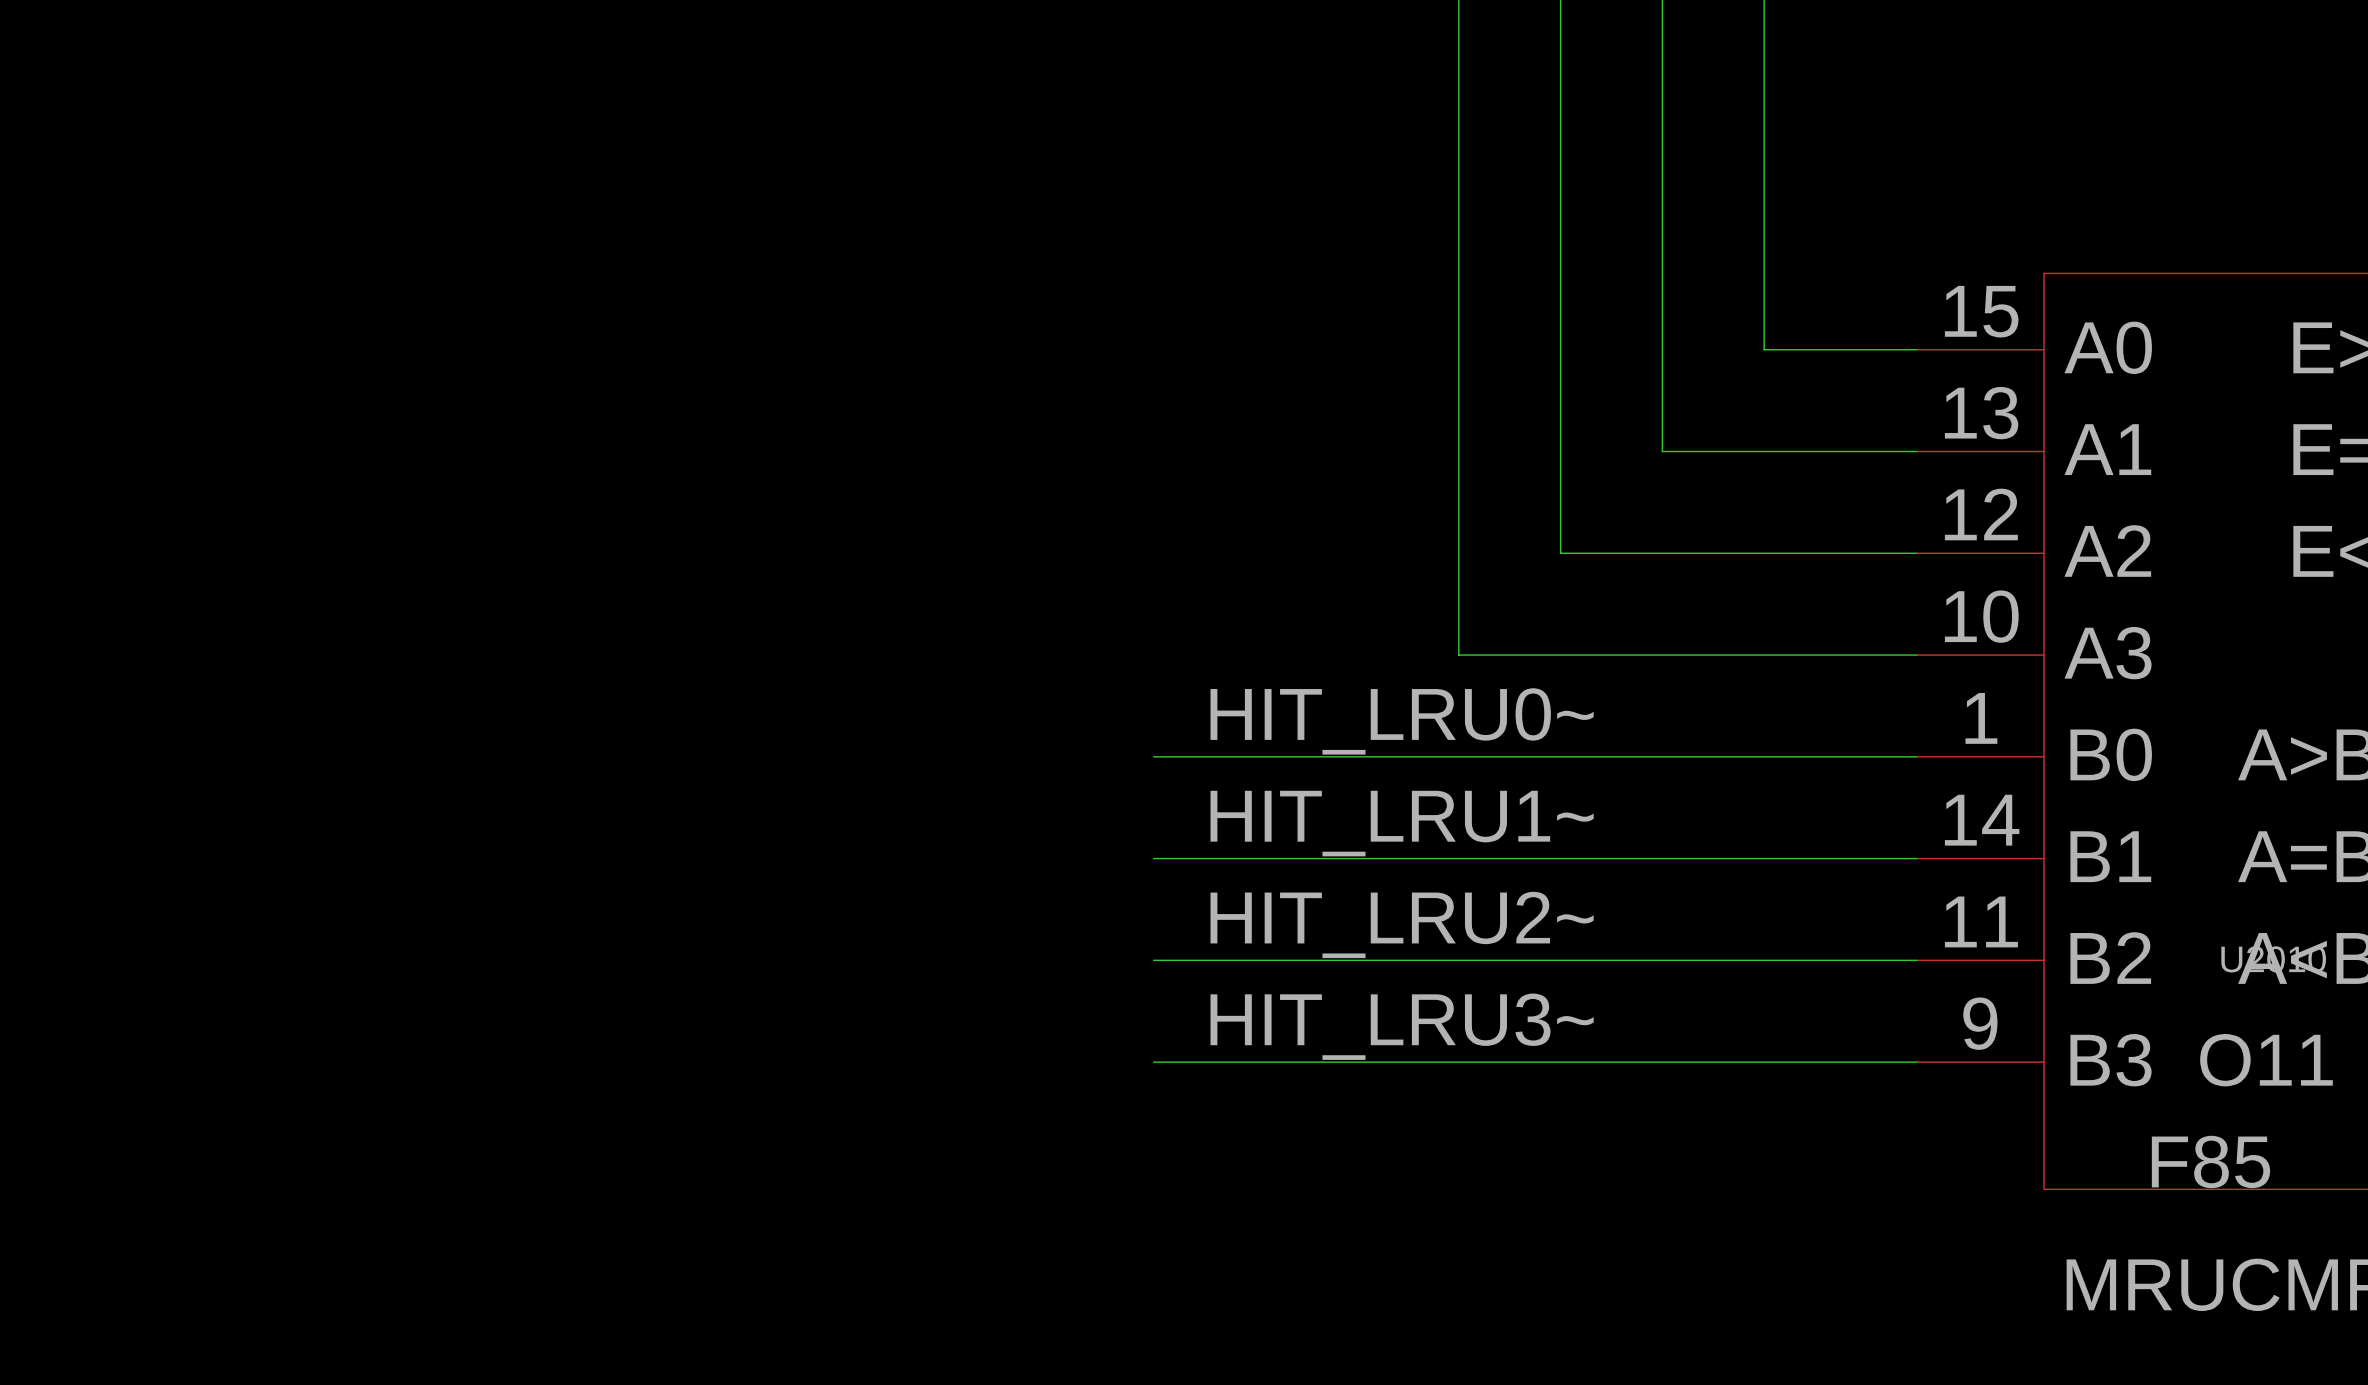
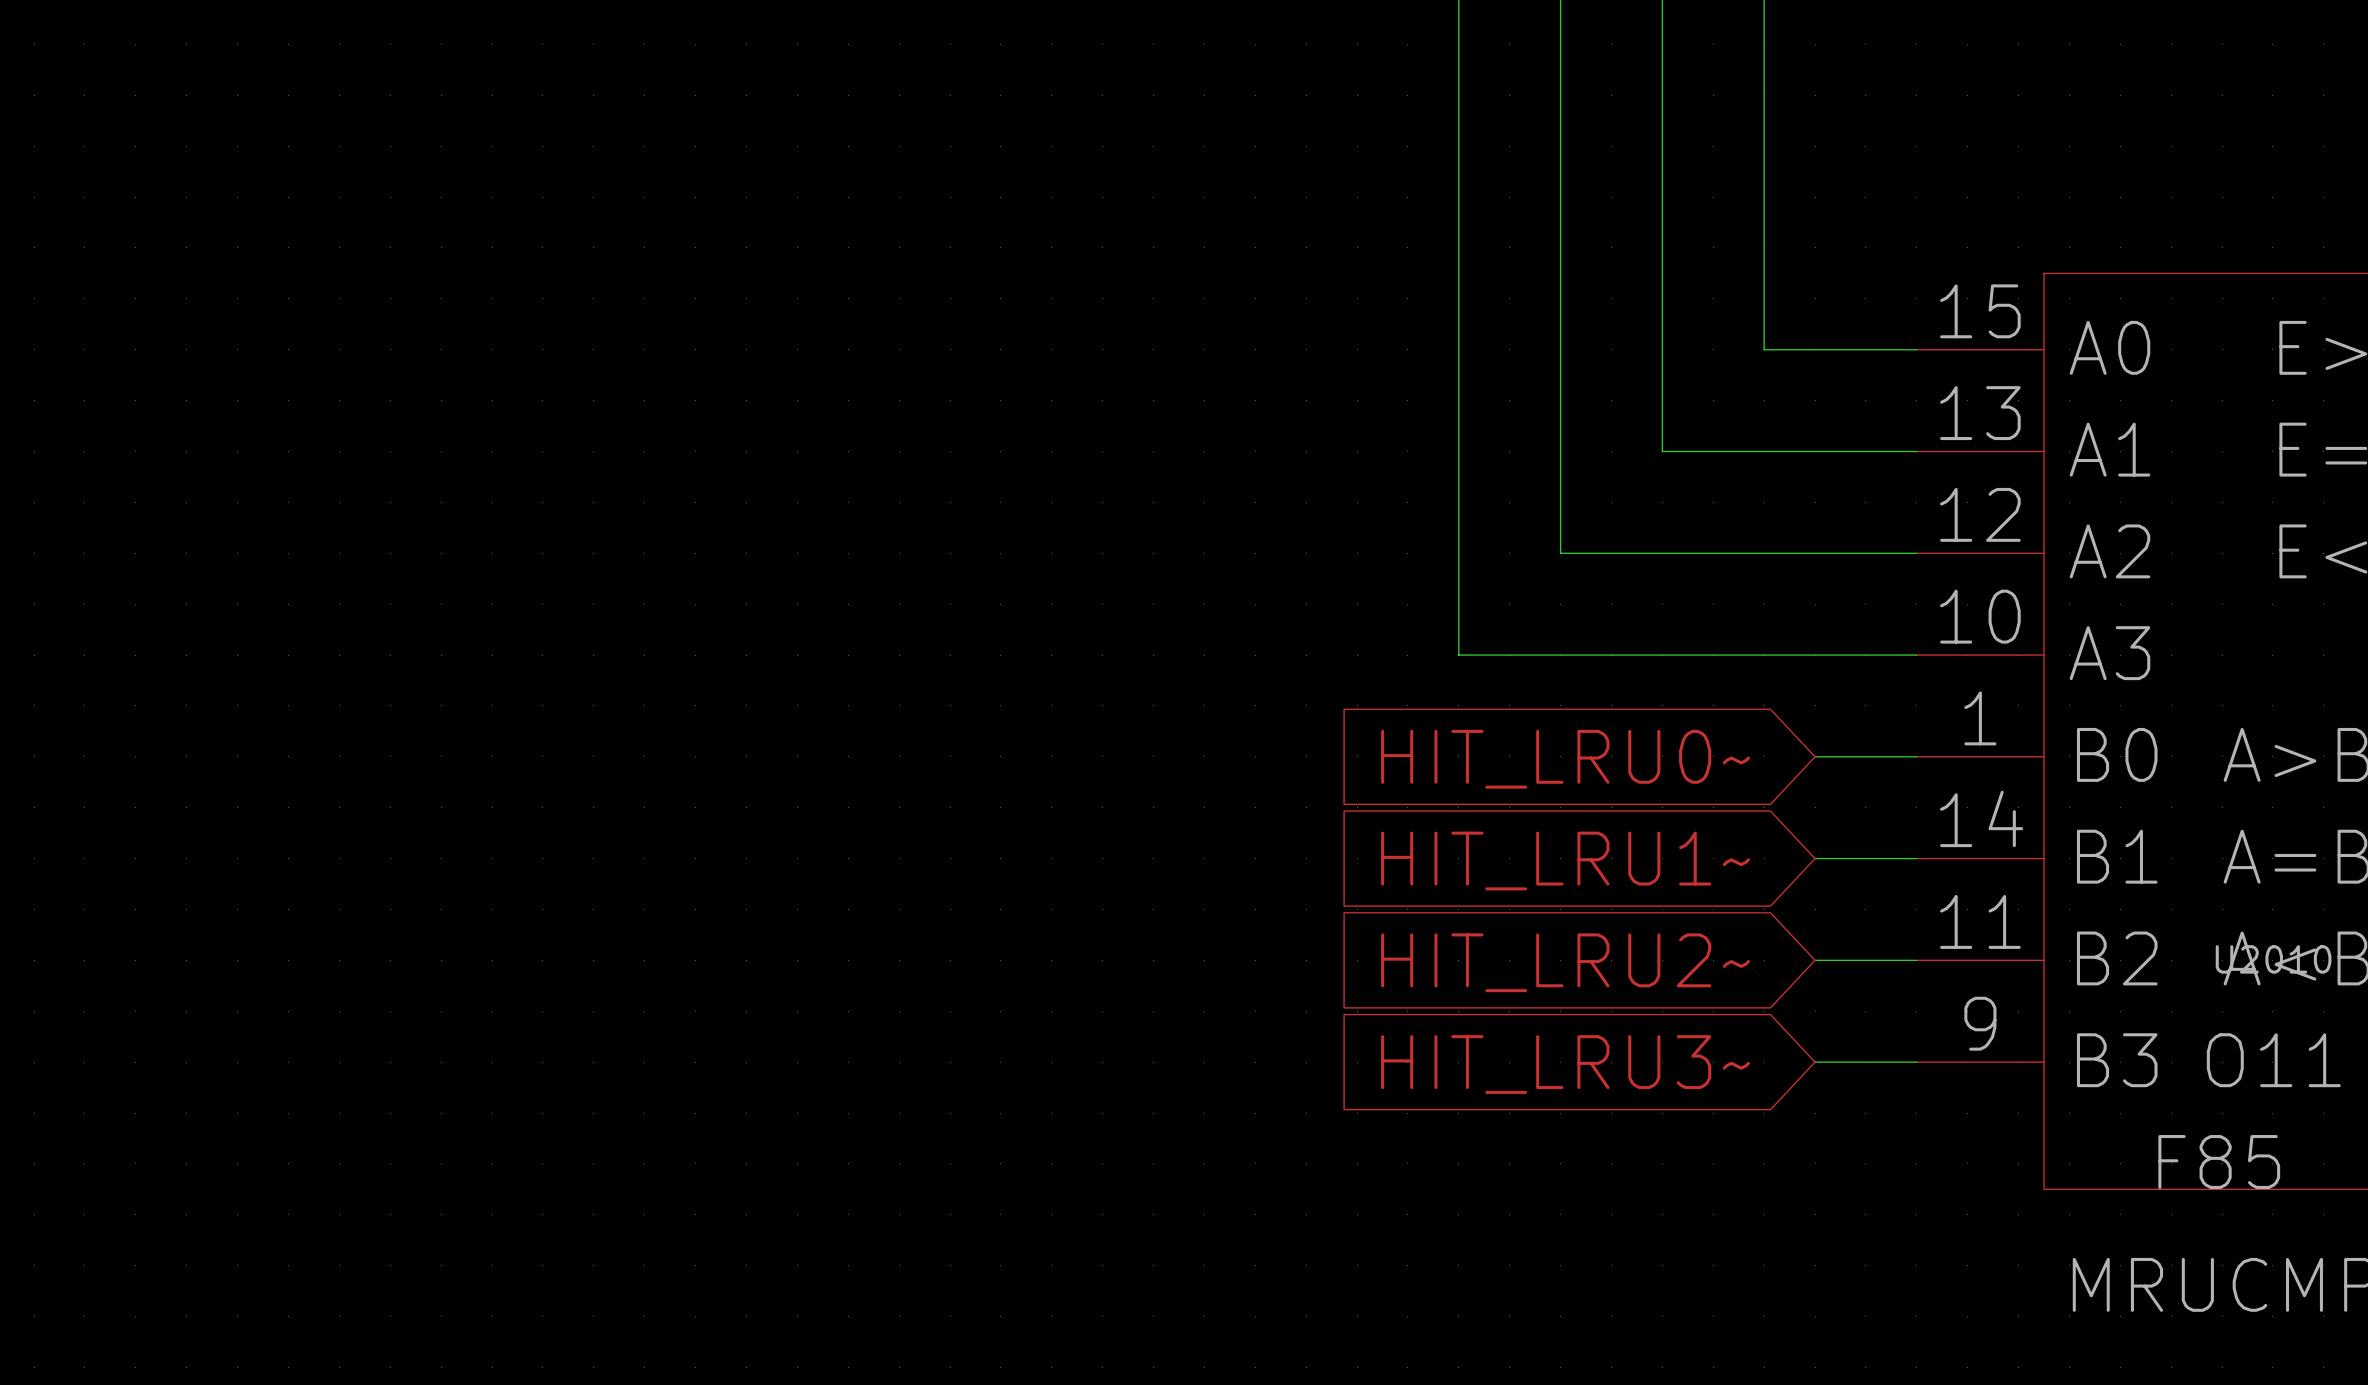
label: HIT_LRU0~ (1402, 721) -> none
wire: (1153, 756) (1815, 756) -> none
global label: none -> HIT_LRU0~ (1565, 759)
label: HIT_LRU1~ (1402, 823) -> none
wire: (1153, 858) (1815, 858) -> none
global label: none -> HIT_LRU1~ (1565, 861)
label: HIT_LRU2~ (1402, 924) -> none
wire: (1153, 960) (1815, 960) -> none
global label: none -> HIT_LRU2~ (1565, 962)
label: HIT_LRU3~ (1402, 1026) -> none
wire: (1153, 1062) (1815, 1062) -> none
global label: none -> HIT_LRU3~ (1565, 1064)

